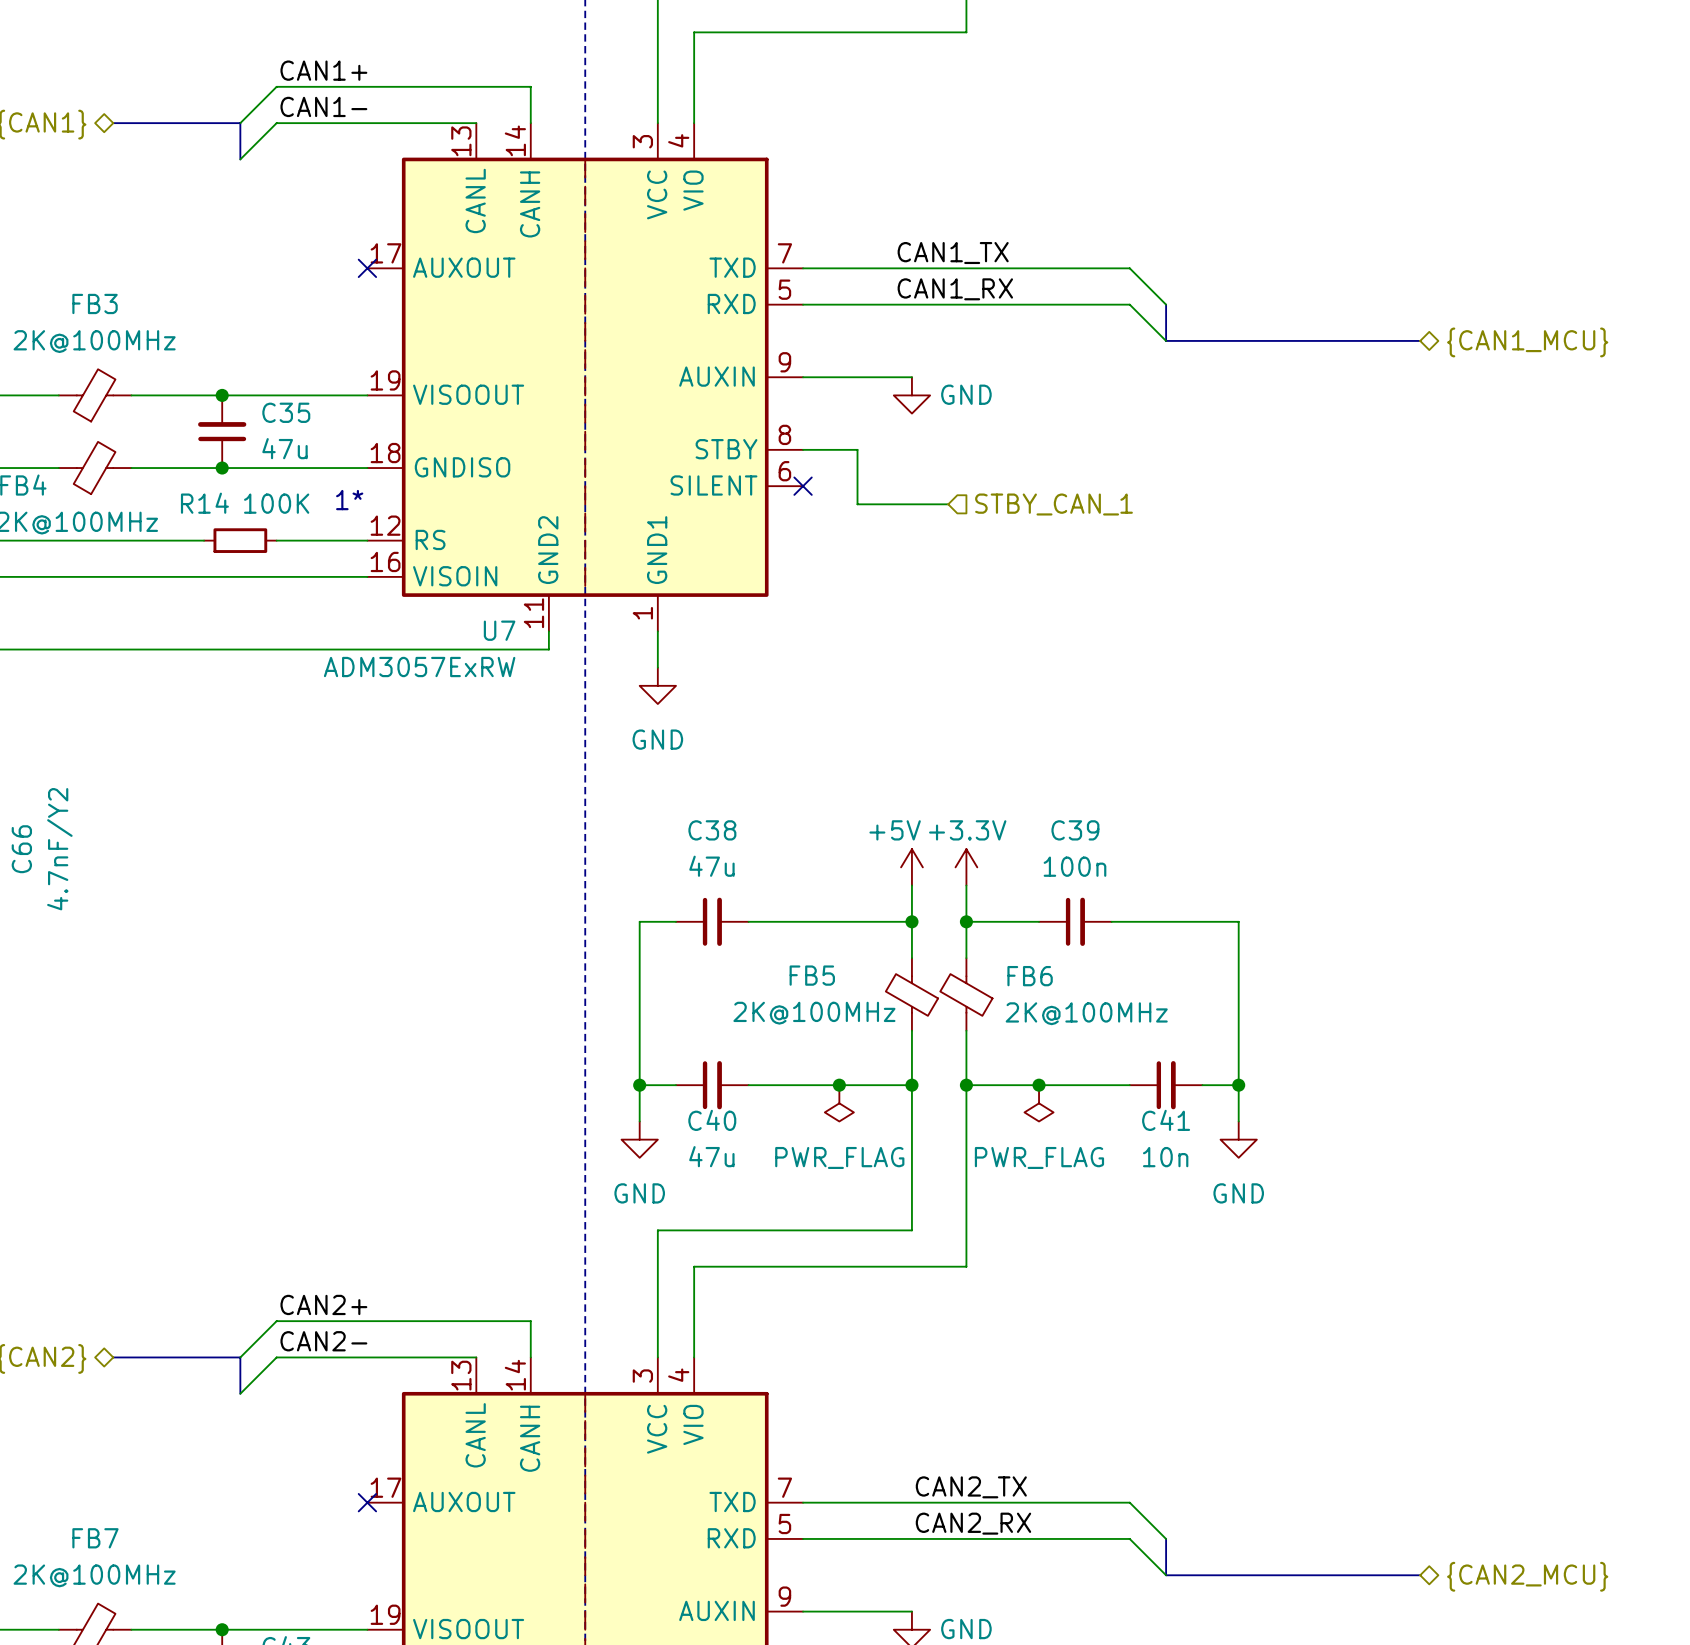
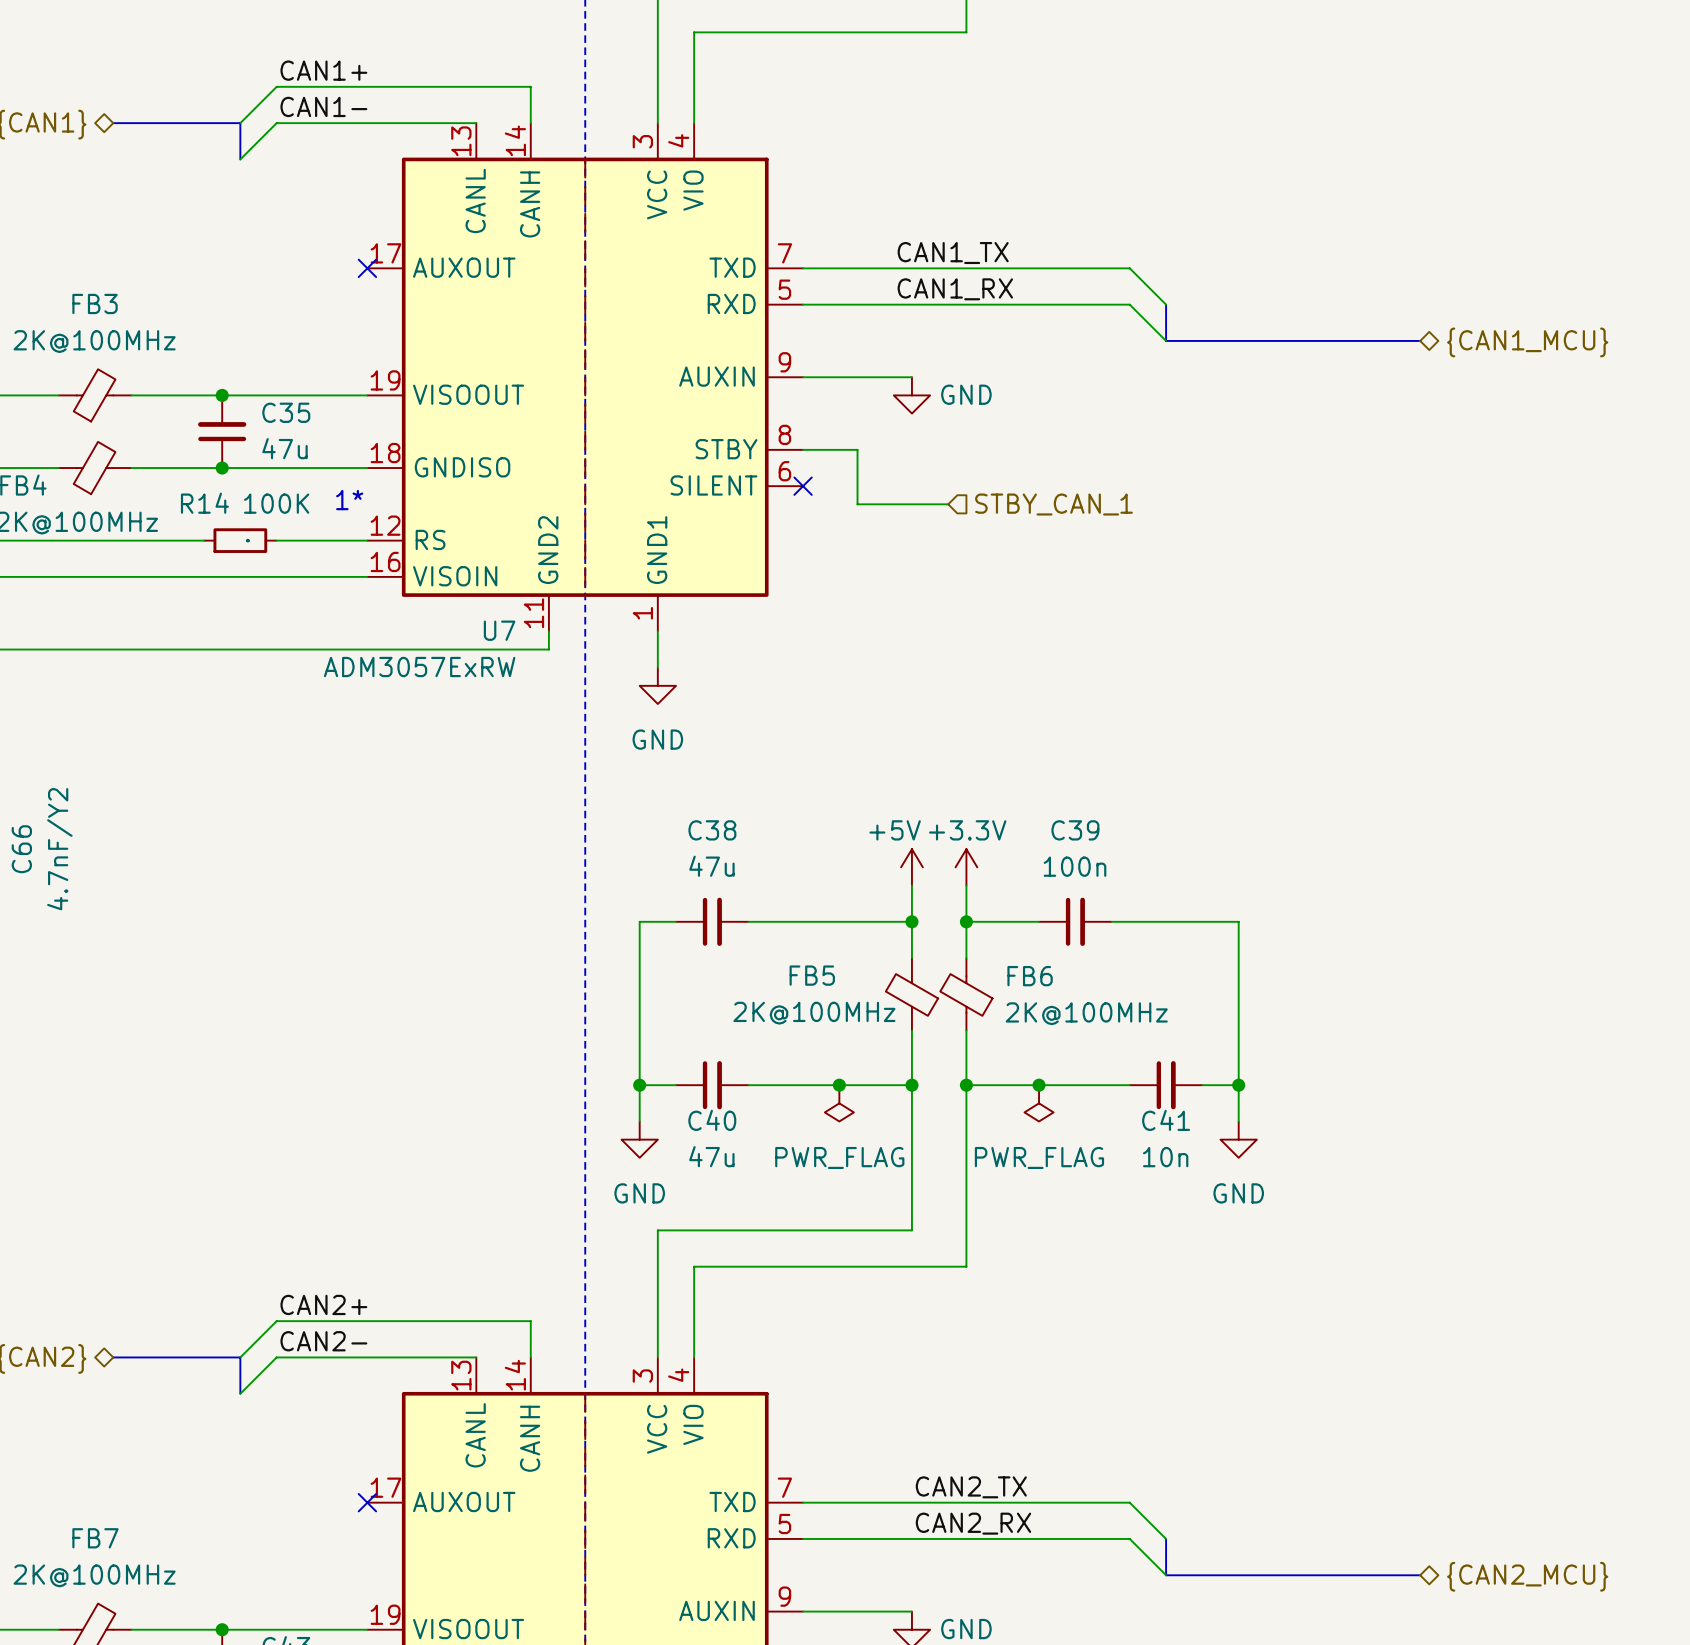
R14 text: none -> . (247, 540)

